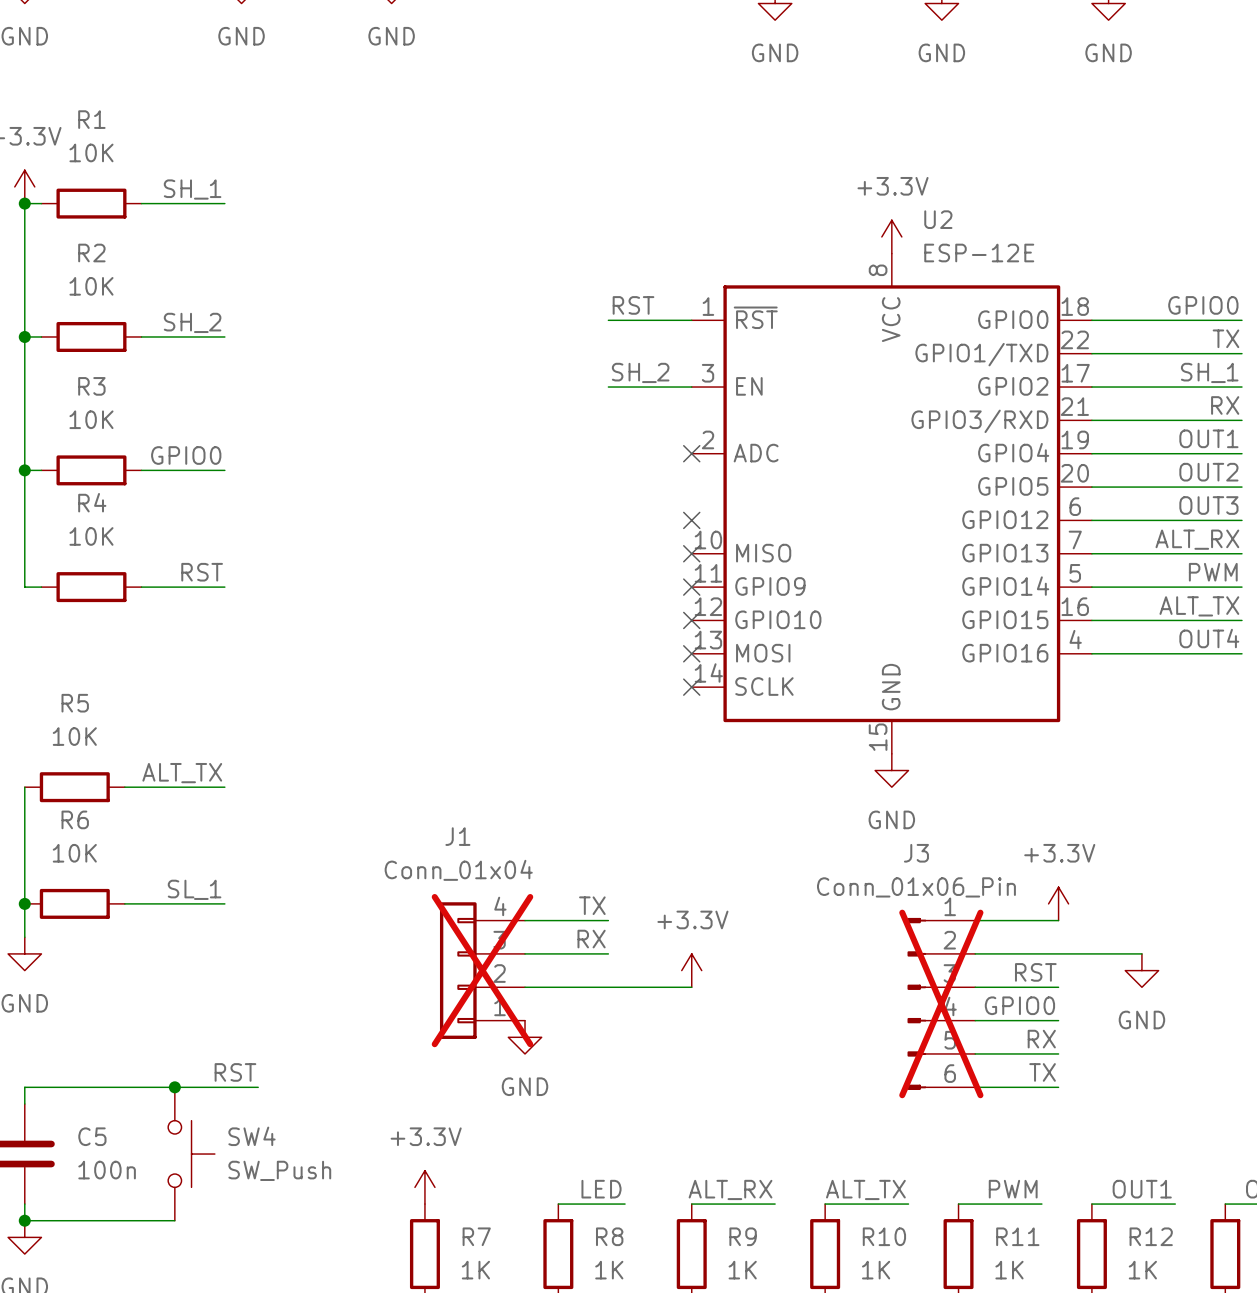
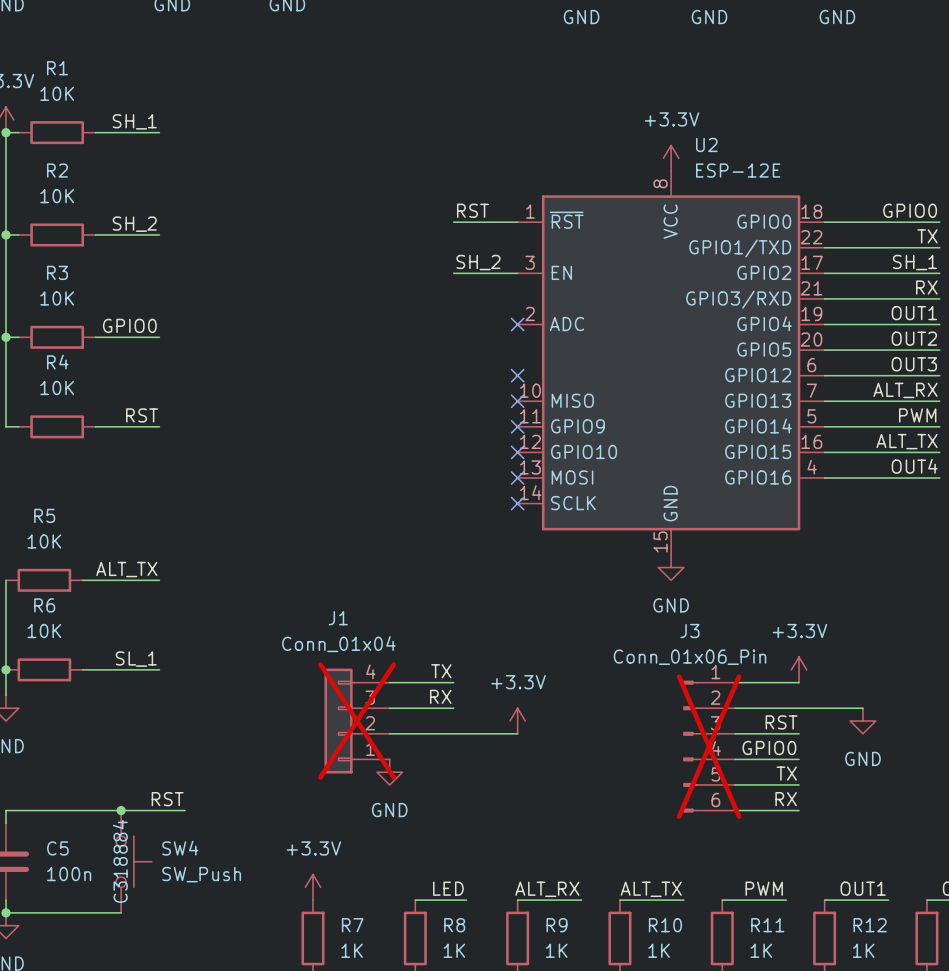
label: RX (1041, 1039) -> TX (786, 773)
label: TX (1042, 1072) -> RX (786, 799)
SW4 text: none -> C318884 (120, 861)

